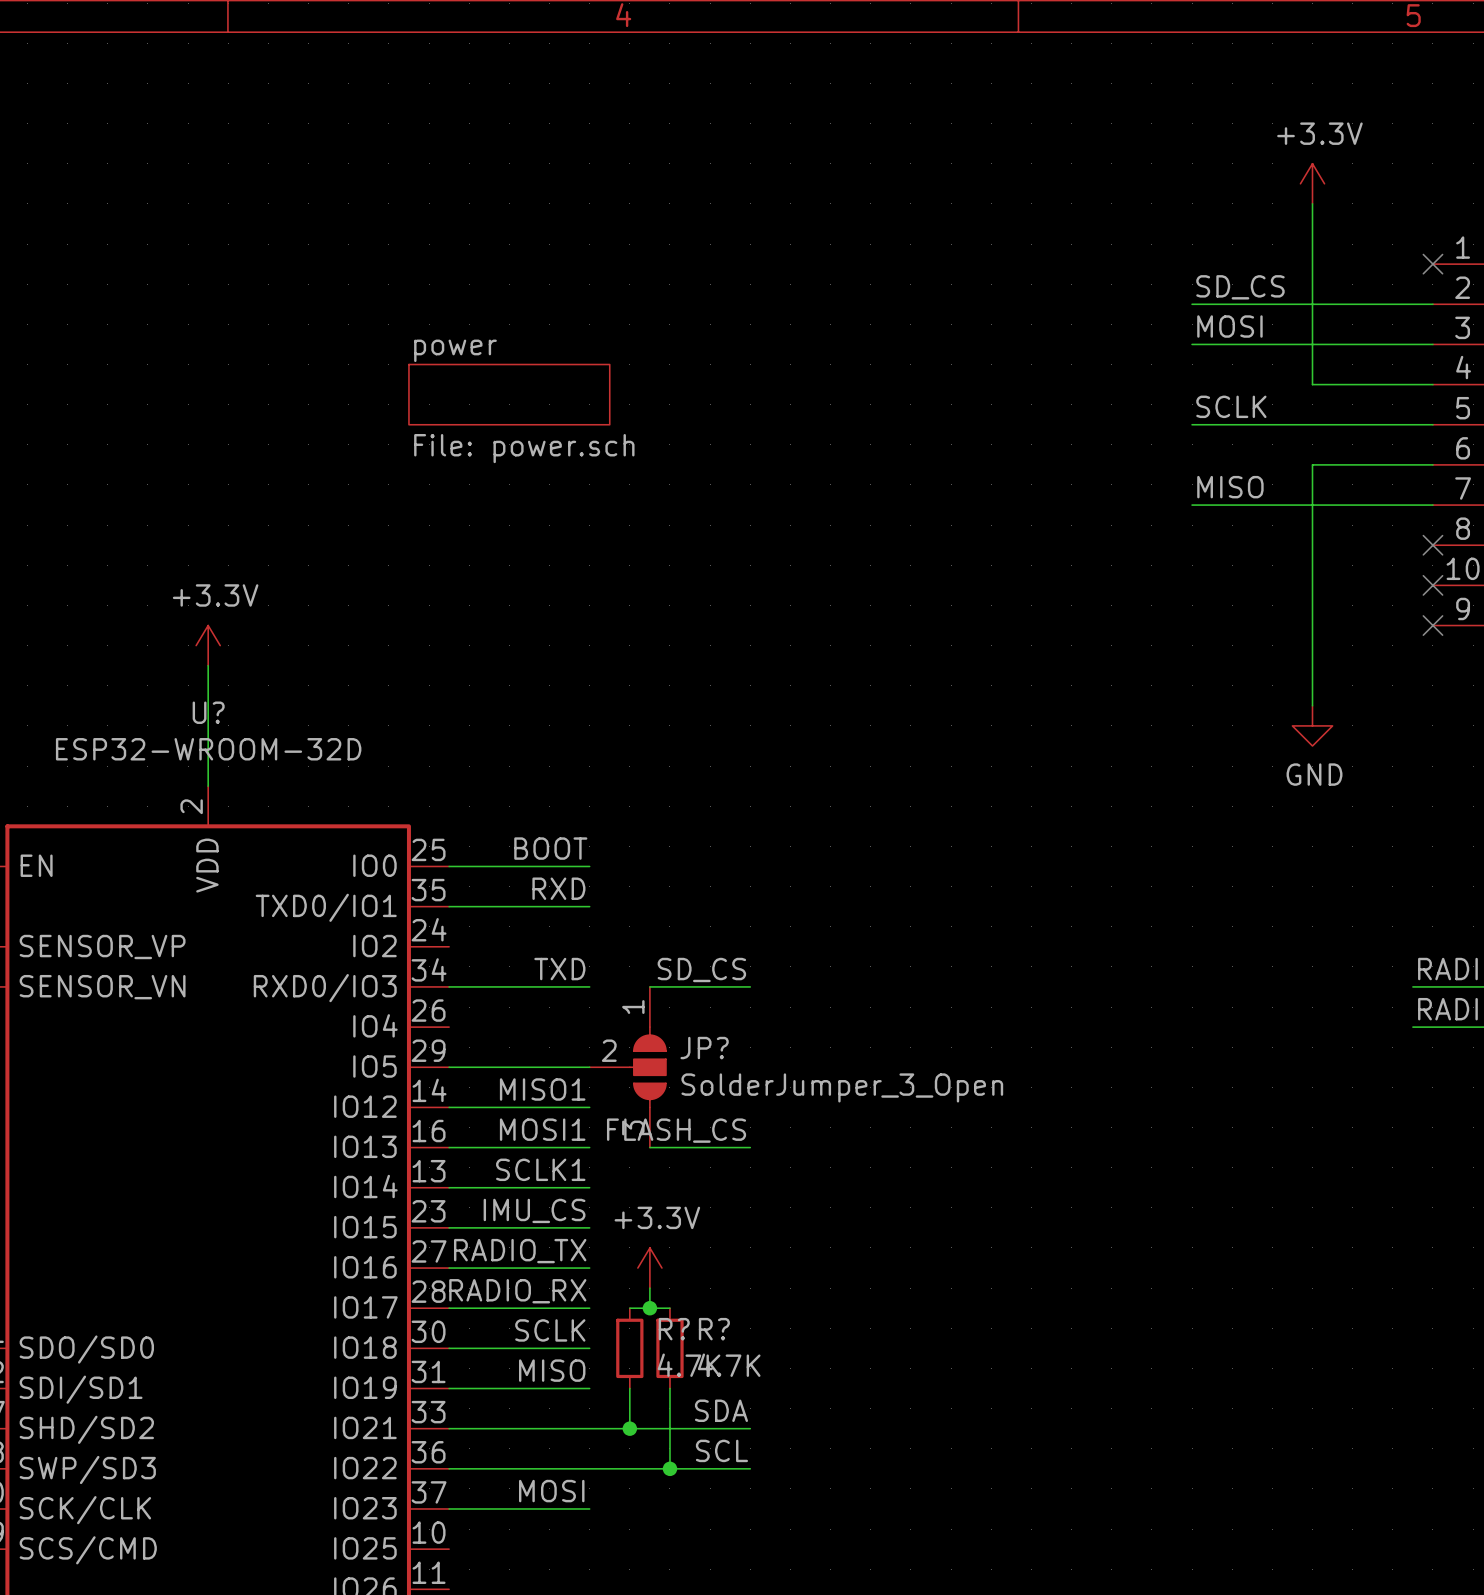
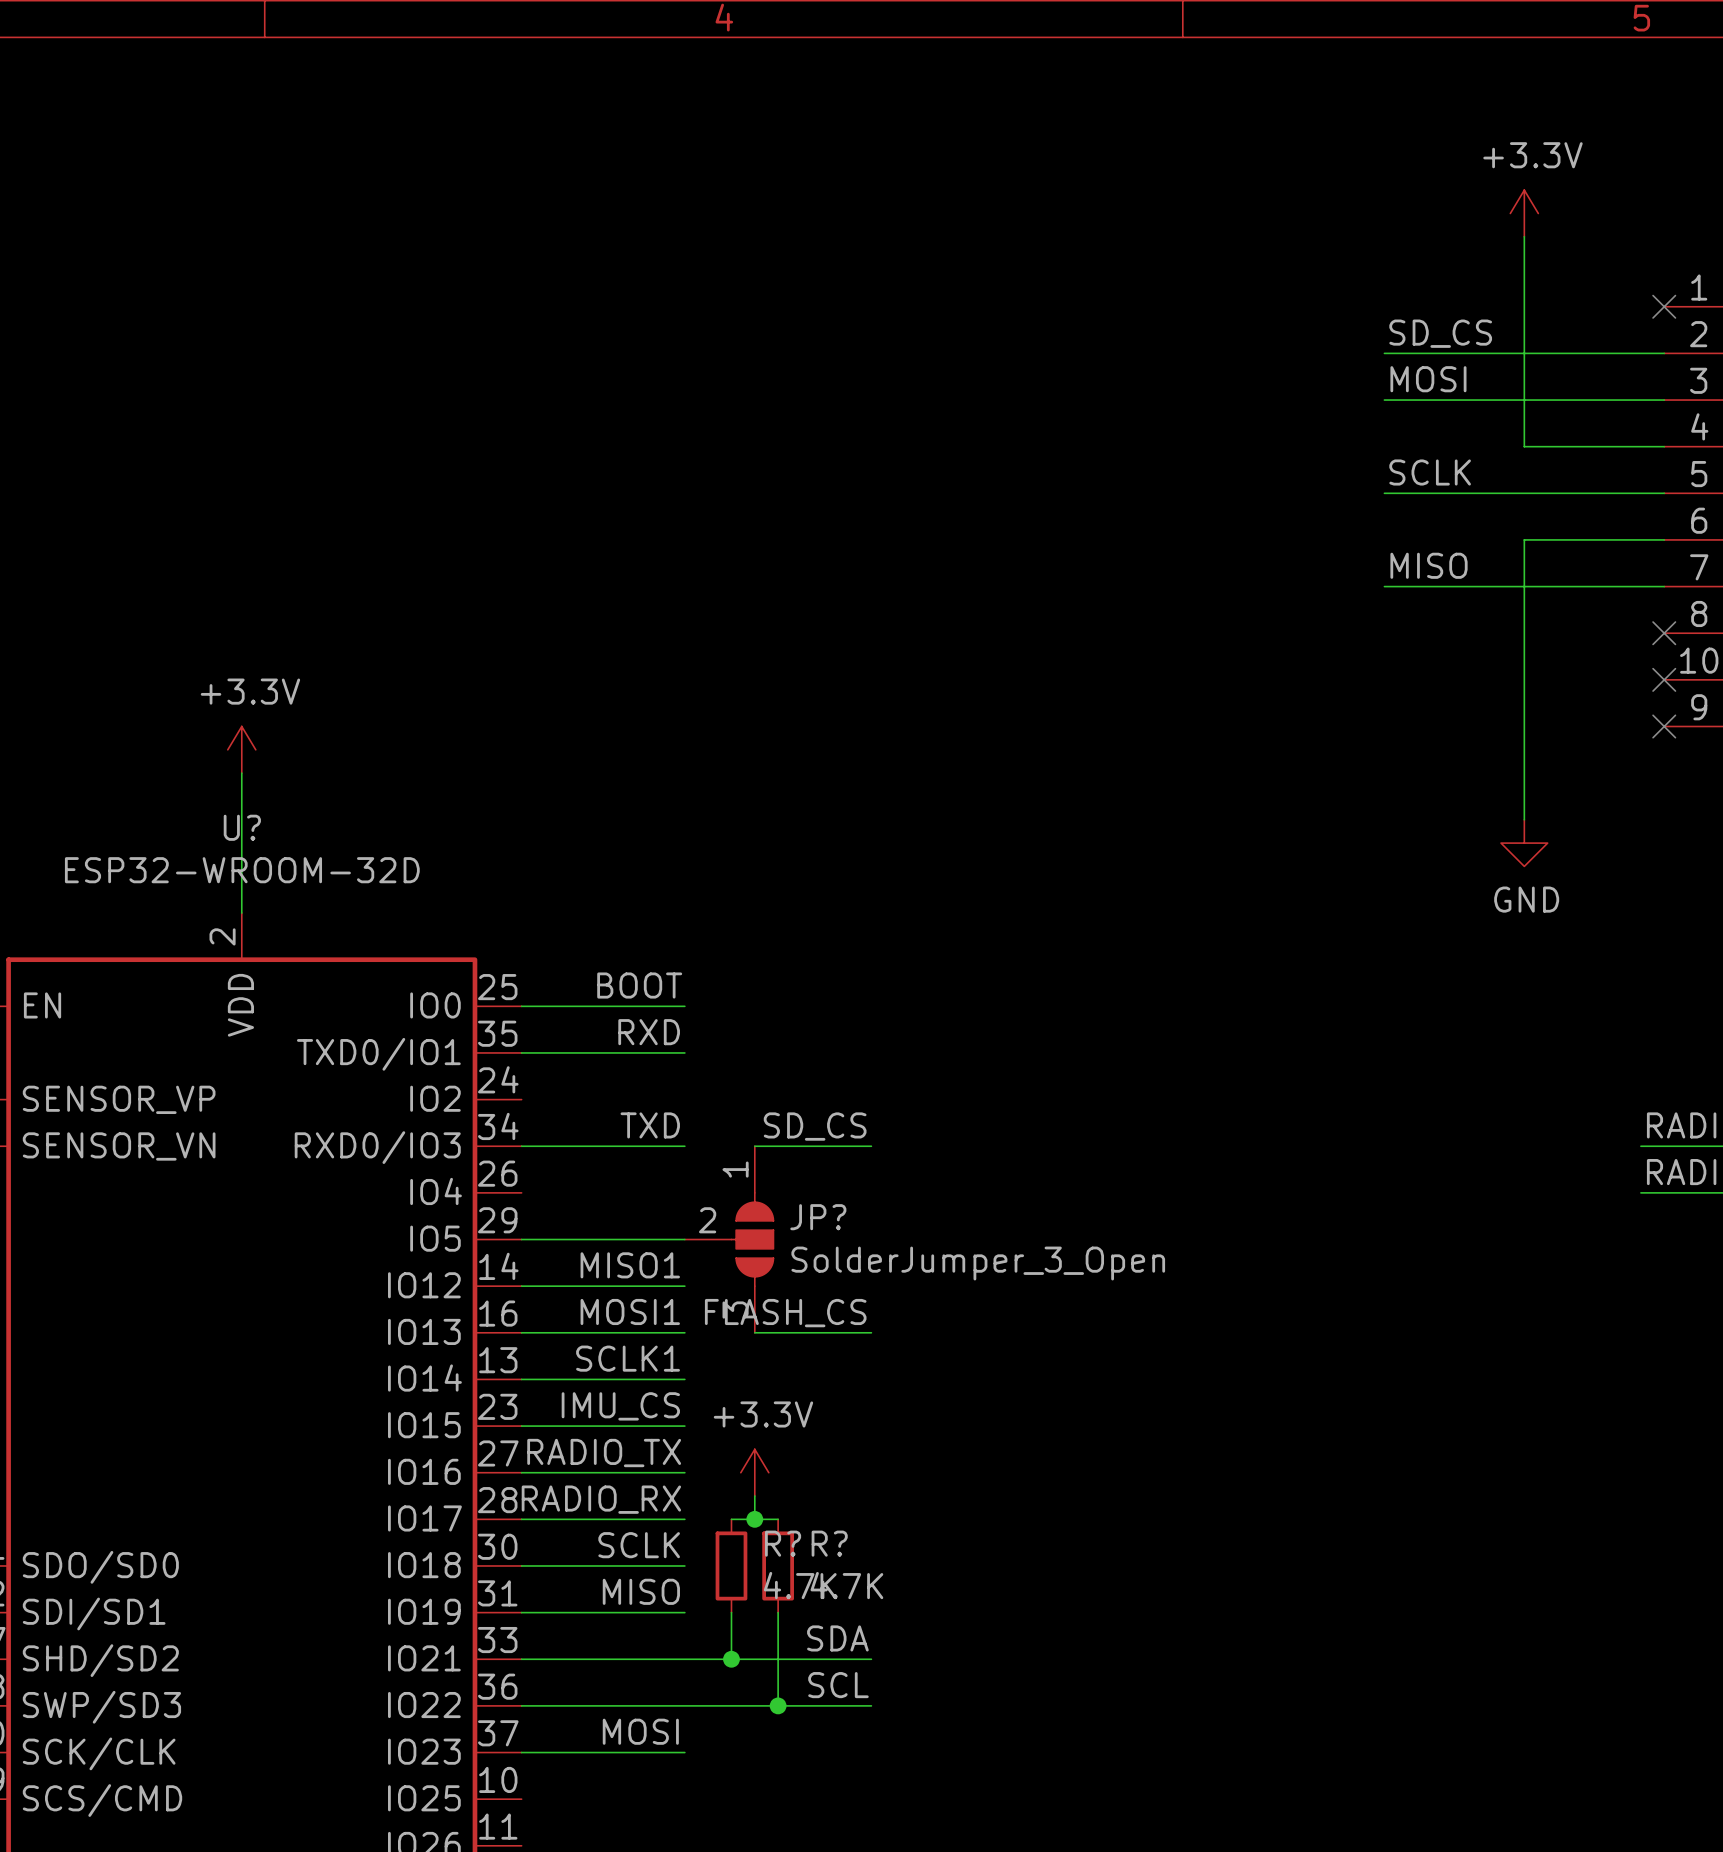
sheet power: File: power.sch (509, 394) -> none

